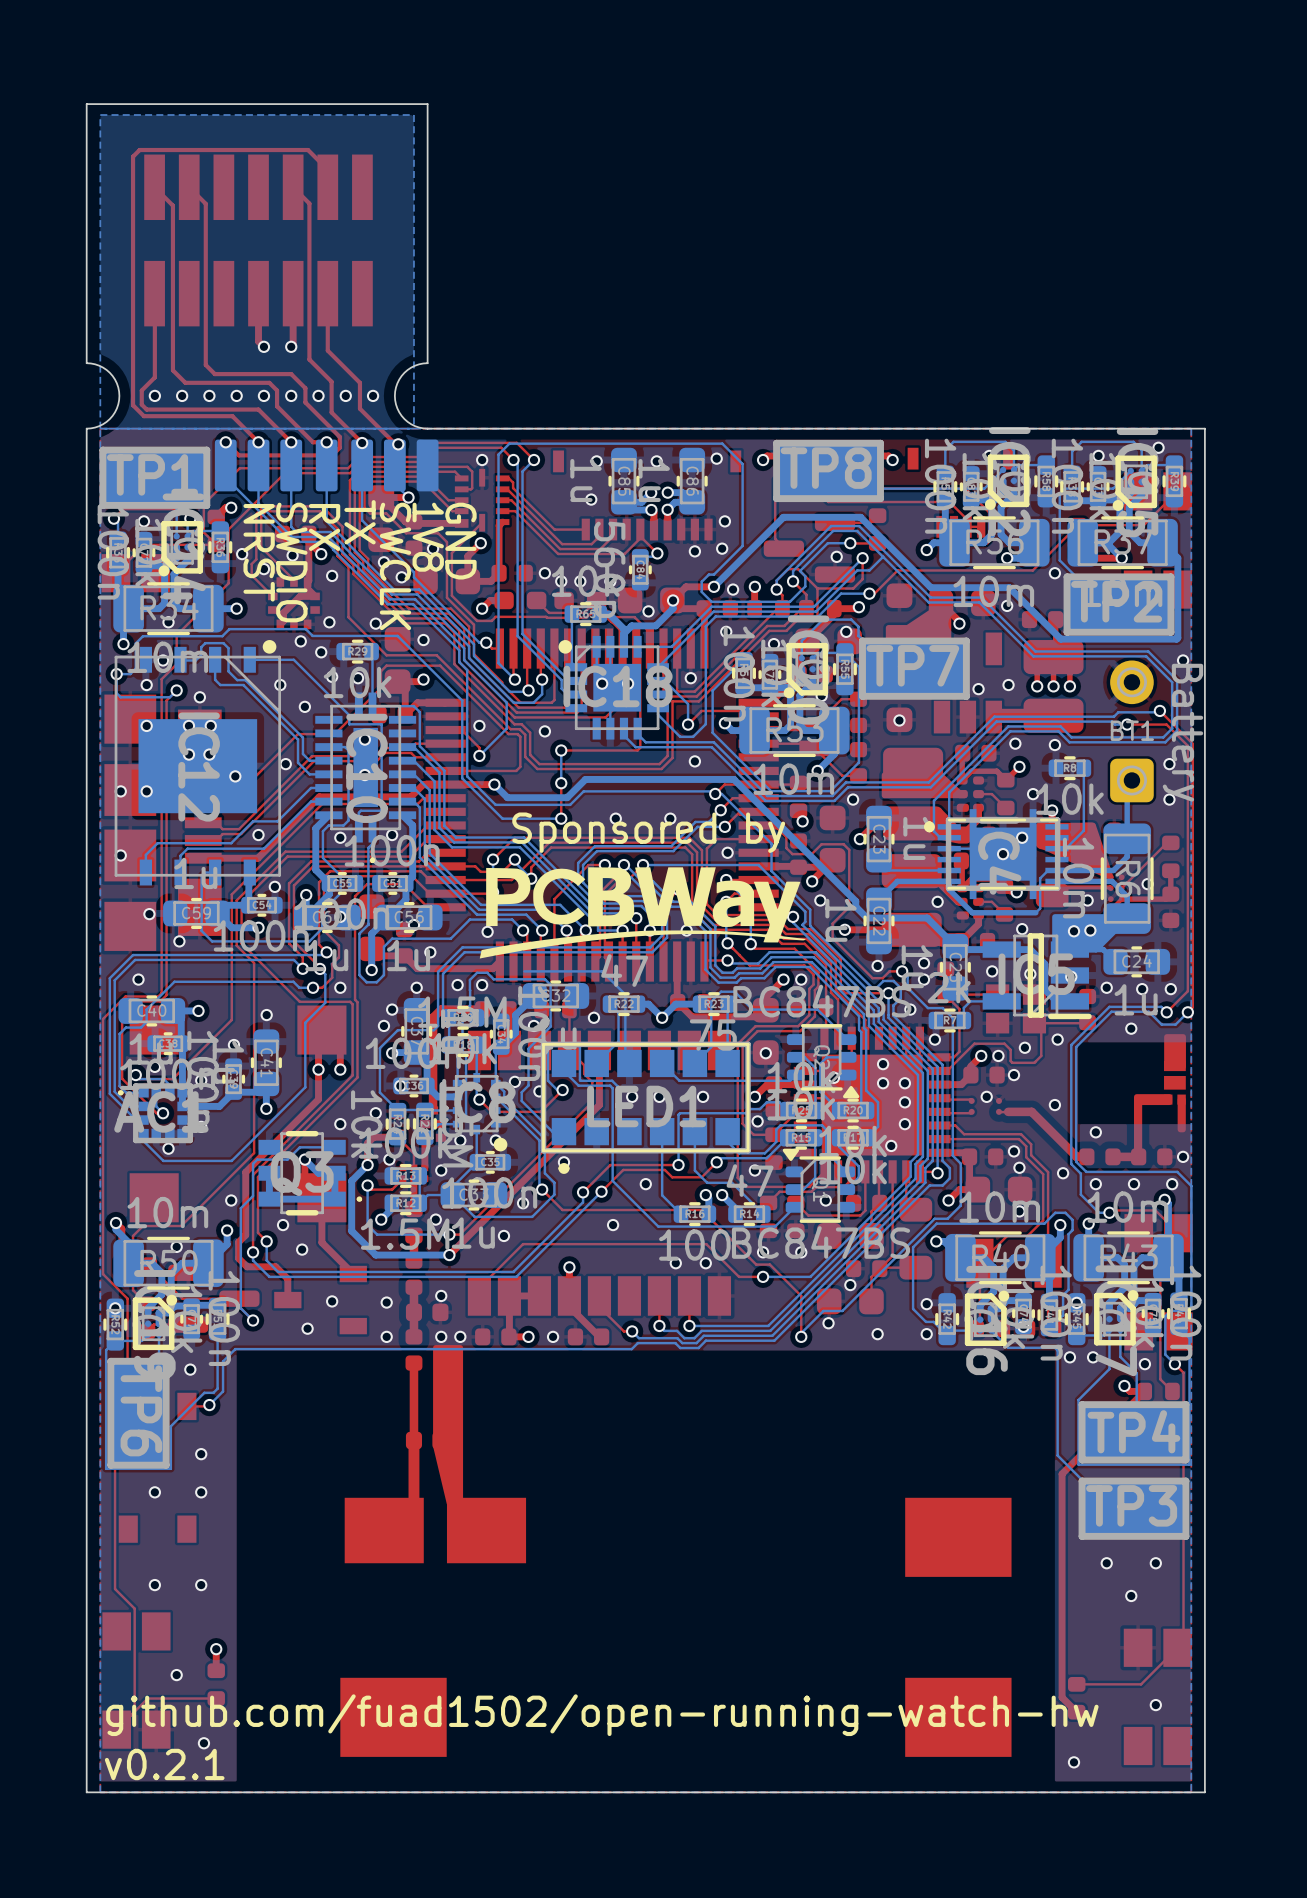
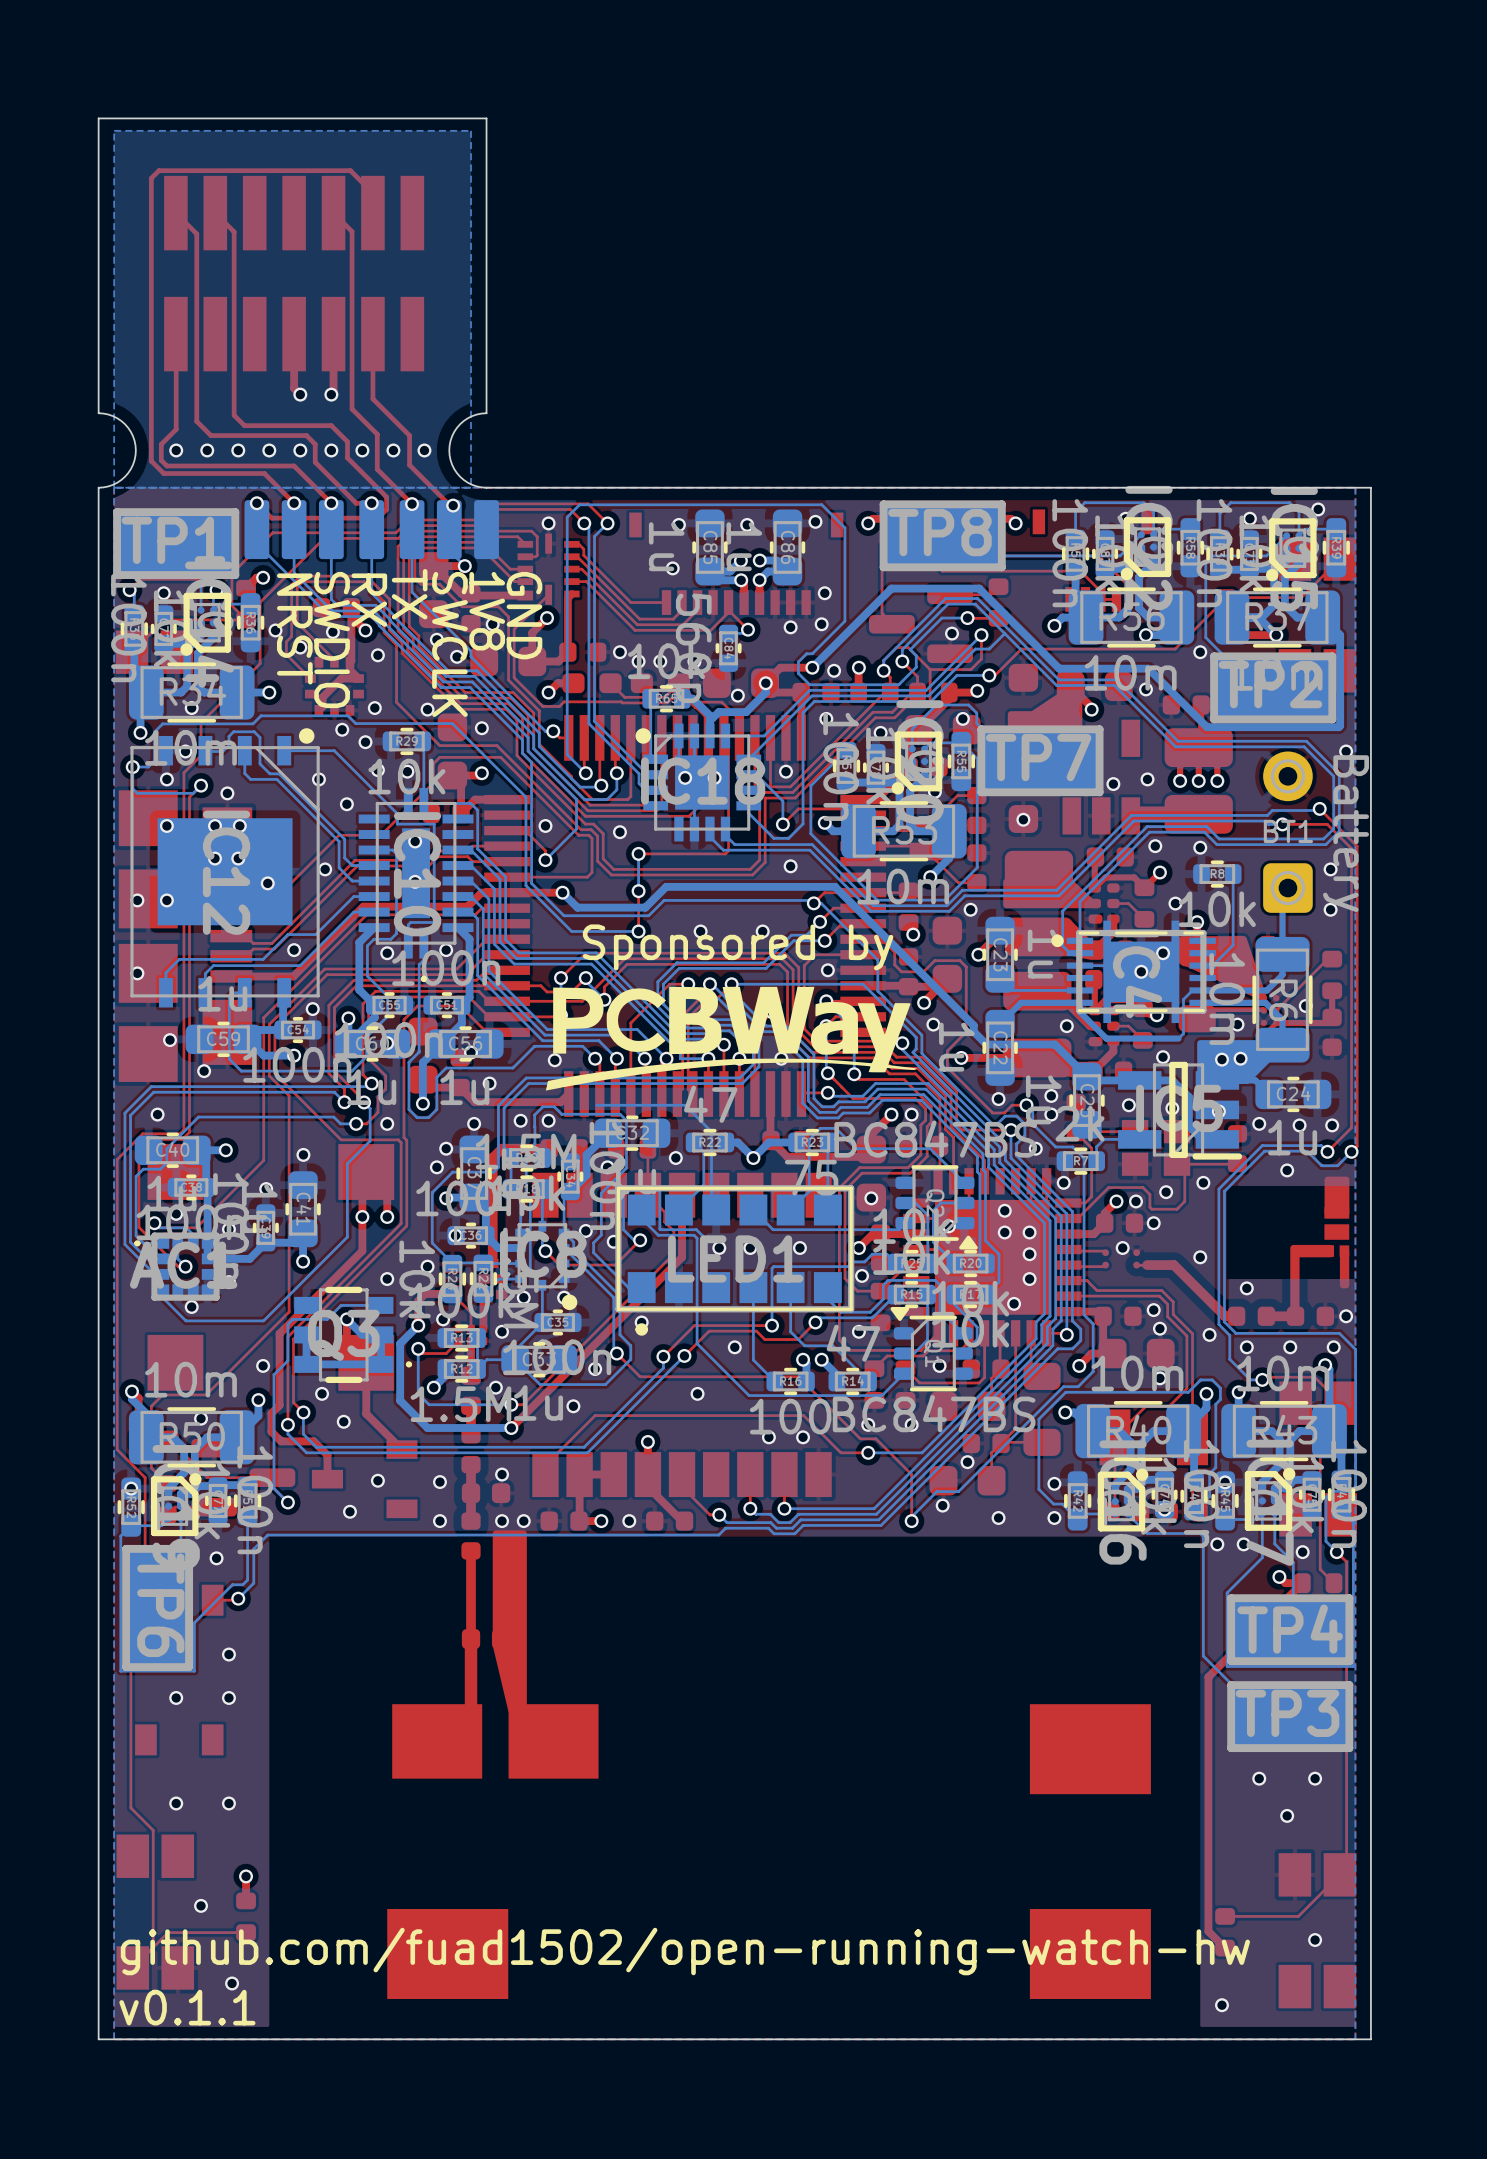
text: v0.2.1 (164, 1764) -> v0.1.1 (187, 2007)

